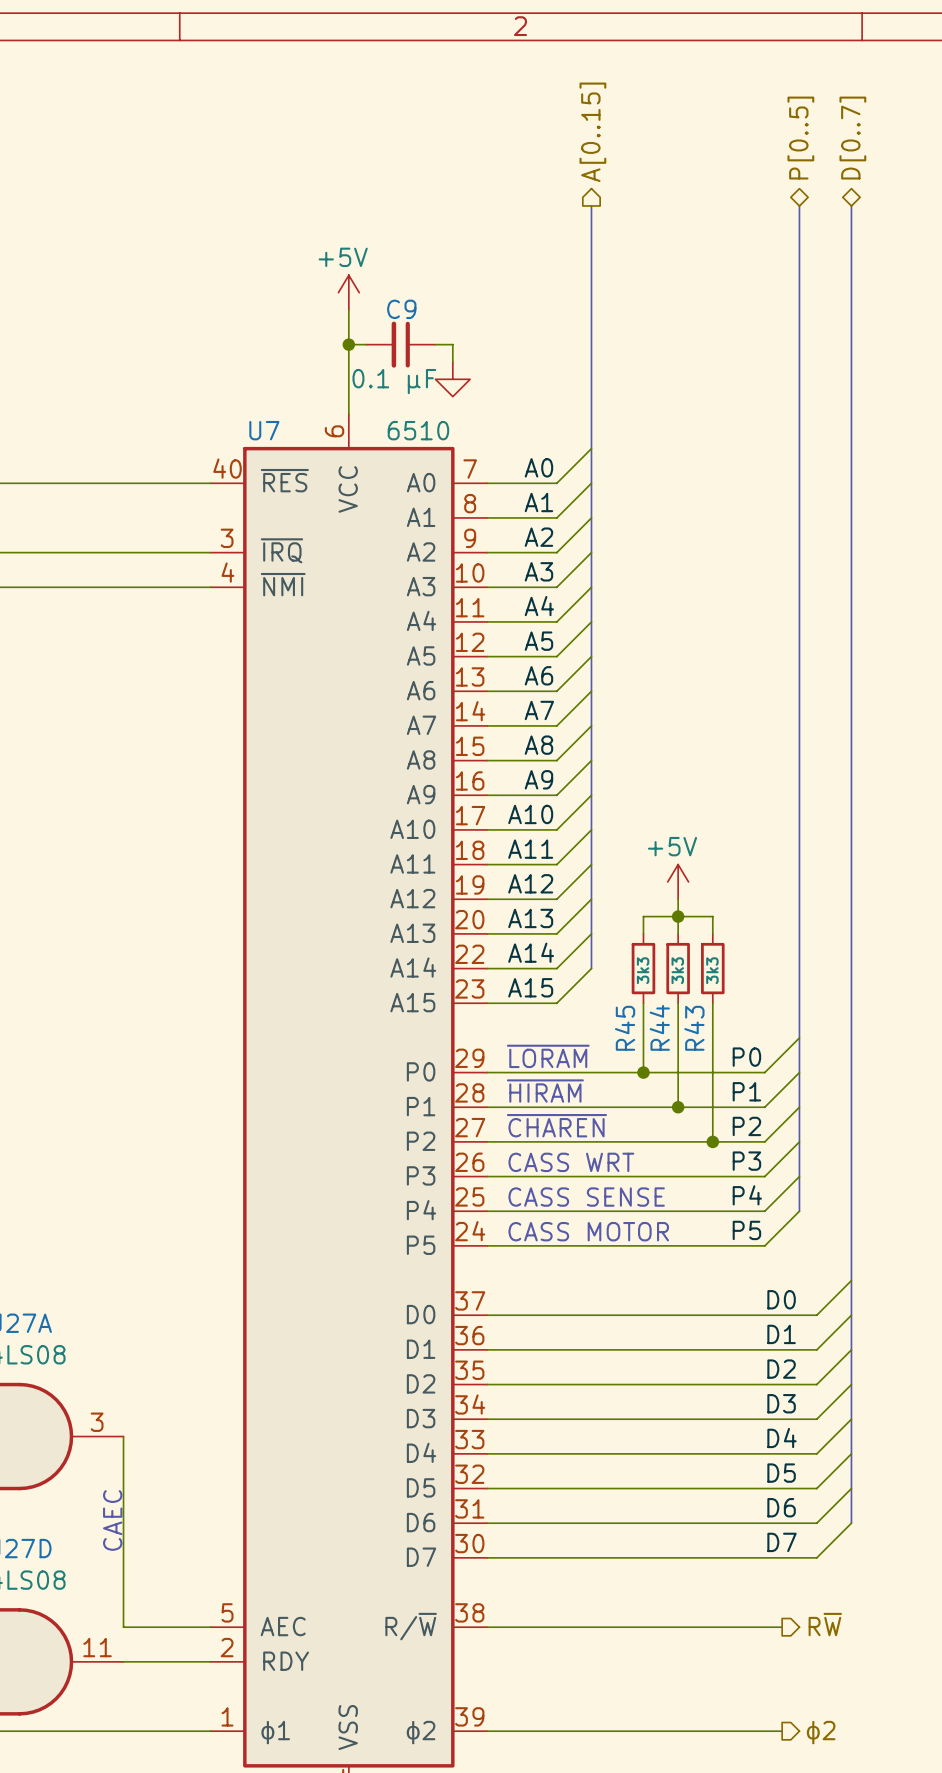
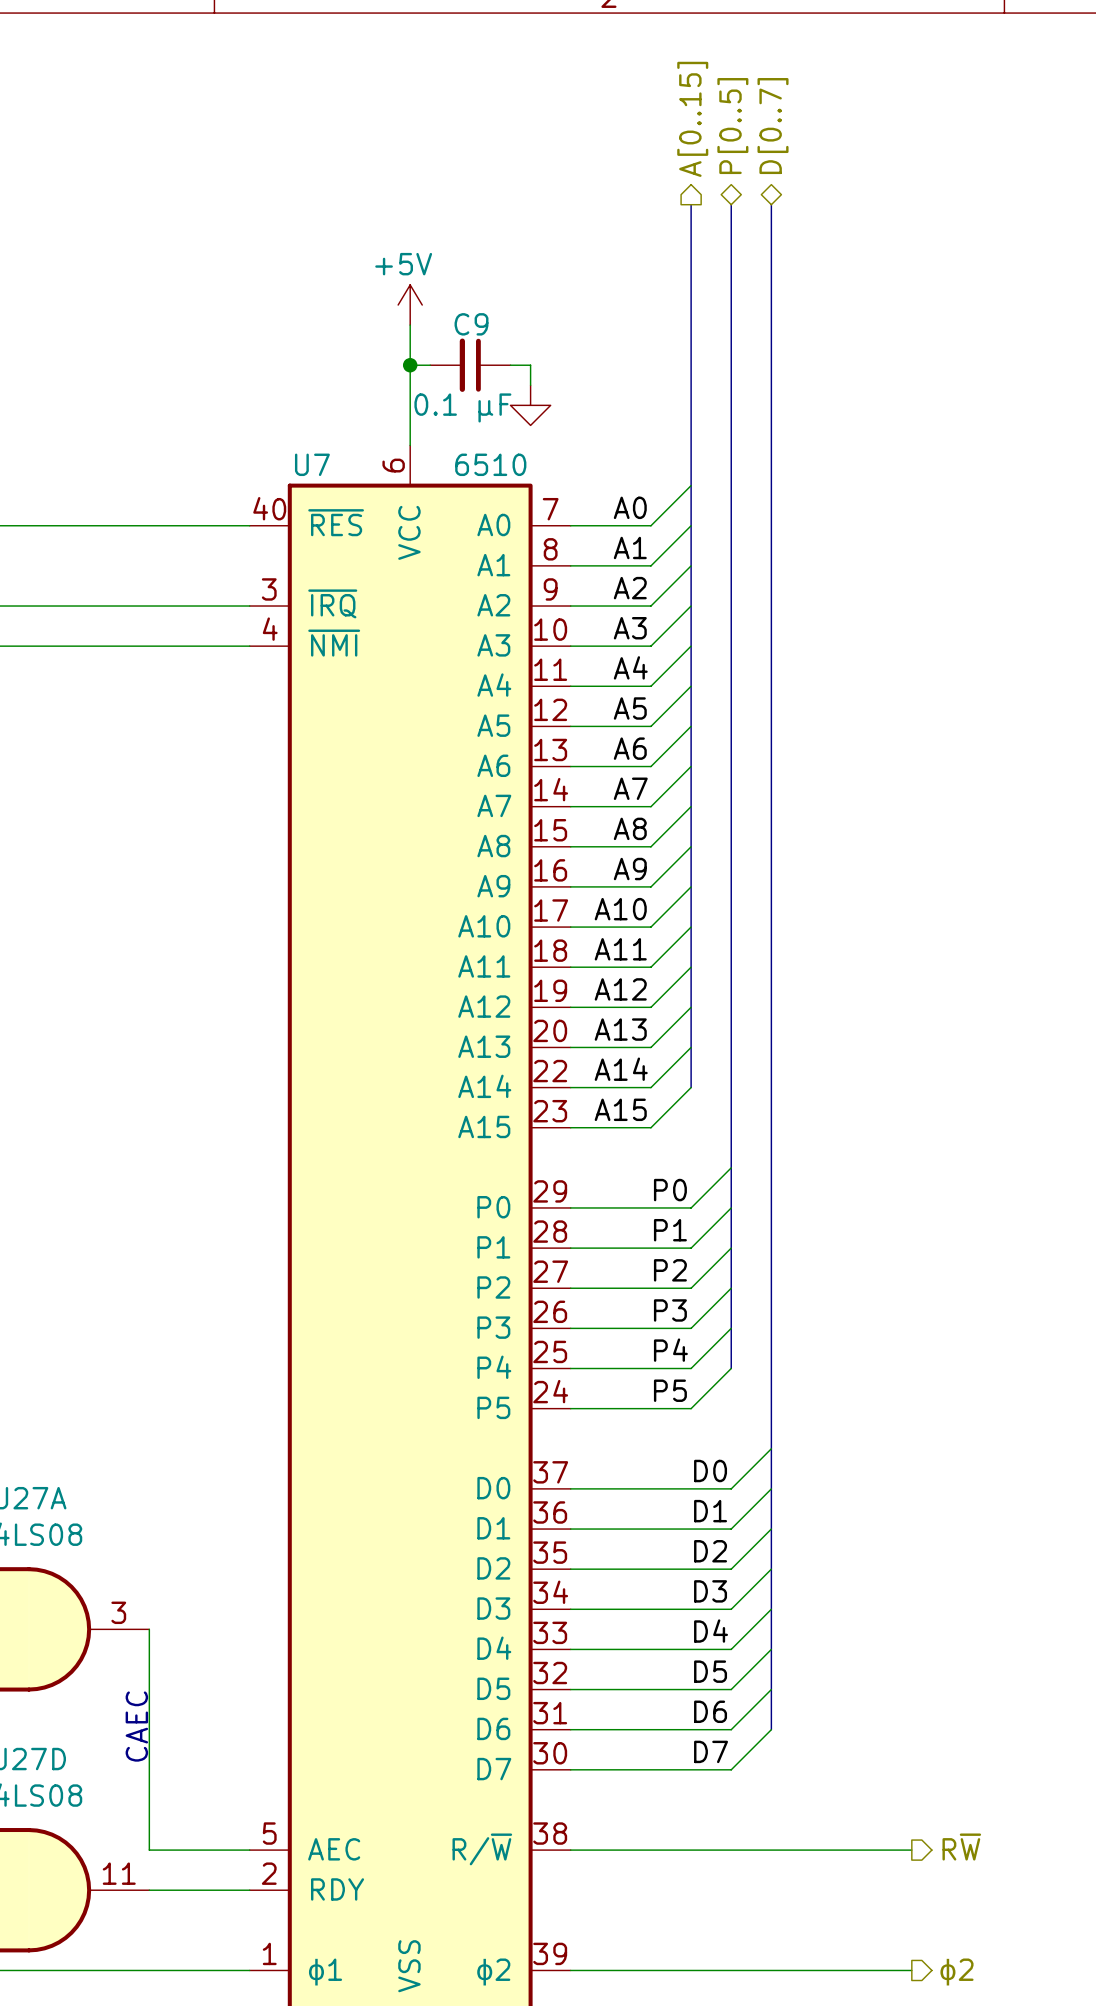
hierarchical label position: P[0..5] (800, 138) -> P[0..5] (732, 126)
hierarchical label position: D[0..7] (852, 138) -> D[0..7] (773, 126)
bus: (799, 205) (799, 1211) -> (731, 204) (731, 1368)
bus: (851, 205) (851, 1523) -> (771, 204) (771, 1729)
power symbol: +5V (678, 881) -> none
wire: (678, 899) (678, 933) -> none
junction: (678, 916) -> none
wire: (643, 933) (643, 916) (712, 916) (712, 933) -> none
R45: 3k3 (643, 968) -> none
R44: 3k3 (678, 968) -> none
R43: 3k3 (712, 968) -> none
wire: (643, 1003) (643, 1072) -> none
wire: (678, 1003) (678, 1107) -> none
wire: (712, 1003) (712, 1141) -> none
wire: (799, 1037) (764, 1072) (591, 1072) -> (731, 1167) (691, 1207)
text: ~{LORAM} (548, 1056) -> none
label position: P0 (746, 1057) -> P0 (670, 1190)
junction: (643, 1072) -> none
wire: (799, 1072) (764, 1107) (591, 1107) -> (731, 1207) (691, 1248)
text: ~{HIRAM} (545, 1091) -> none
label position: P1 (746, 1091) -> P1 (670, 1230)
junction: (678, 1107) -> none
wire: (799, 1107) (764, 1141) (591, 1141) -> (731, 1248) (691, 1288)
text: ~{CHAREN} (556, 1125) -> none
label position: P2 (746, 1126) -> P2 (670, 1270)
junction: (712, 1141) -> none
wire: (799, 1141) (764, 1176) (591, 1176) -> (731, 1288) (691, 1328)
label position: P3 (746, 1161) -> P3 (670, 1310)
text: CASS WRT (571, 1162) -> none
wire: (799, 1176) (764, 1211) (591, 1211) -> (731, 1328) (691, 1368)
label position: P4 (747, 1195) -> P4 (670, 1350)
text: CASS SENSE (586, 1197) -> none
wire: (799, 1211) (764, 1245) (591, 1245) -> (731, 1368) (691, 1408)
label position: P5 (746, 1230) -> P5 (670, 1390)
text: CASS MOTOR (588, 1231) -> none
wire: (851, 1280) (816, 1315) (626, 1315) -> (771, 1448) (731, 1488)
label position: D0 (781, 1299) -> D0 (710, 1470)
wire: (851, 1315) (816, 1349) (626, 1349) -> (771, 1488) (731, 1529)
label position: D1 (781, 1334) -> D1 (710, 1511)
wire: (851, 1349) (816, 1384) (626, 1384) -> (771, 1529) (731, 1569)
label position: D2 (781, 1369) -> D2 (710, 1551)
wire: (851, 1384) (816, 1419) (626, 1419) -> (771, 1569) (731, 1609)
label position: D3 (781, 1403) -> D3 (710, 1591)
wire: (851, 1419) (816, 1453) (626, 1453) -> (771, 1609) (731, 1649)
label position: D4 (782, 1437) -> D4 (711, 1631)
wire: (851, 1453) (816, 1488) (626, 1488) -> (771, 1649) (731, 1689)
label position: D5 (781, 1473) -> D5 (710, 1671)
wire: (851, 1488) (816, 1523) (626, 1523) -> (771, 1689) (731, 1729)
label position: D6 (781, 1507) -> D6 (710, 1711)
wire: (851, 1523) (816, 1557) (626, 1557) -> (771, 1729) (731, 1769)
label position: D7 (782, 1542) -> D7 (711, 1751)

